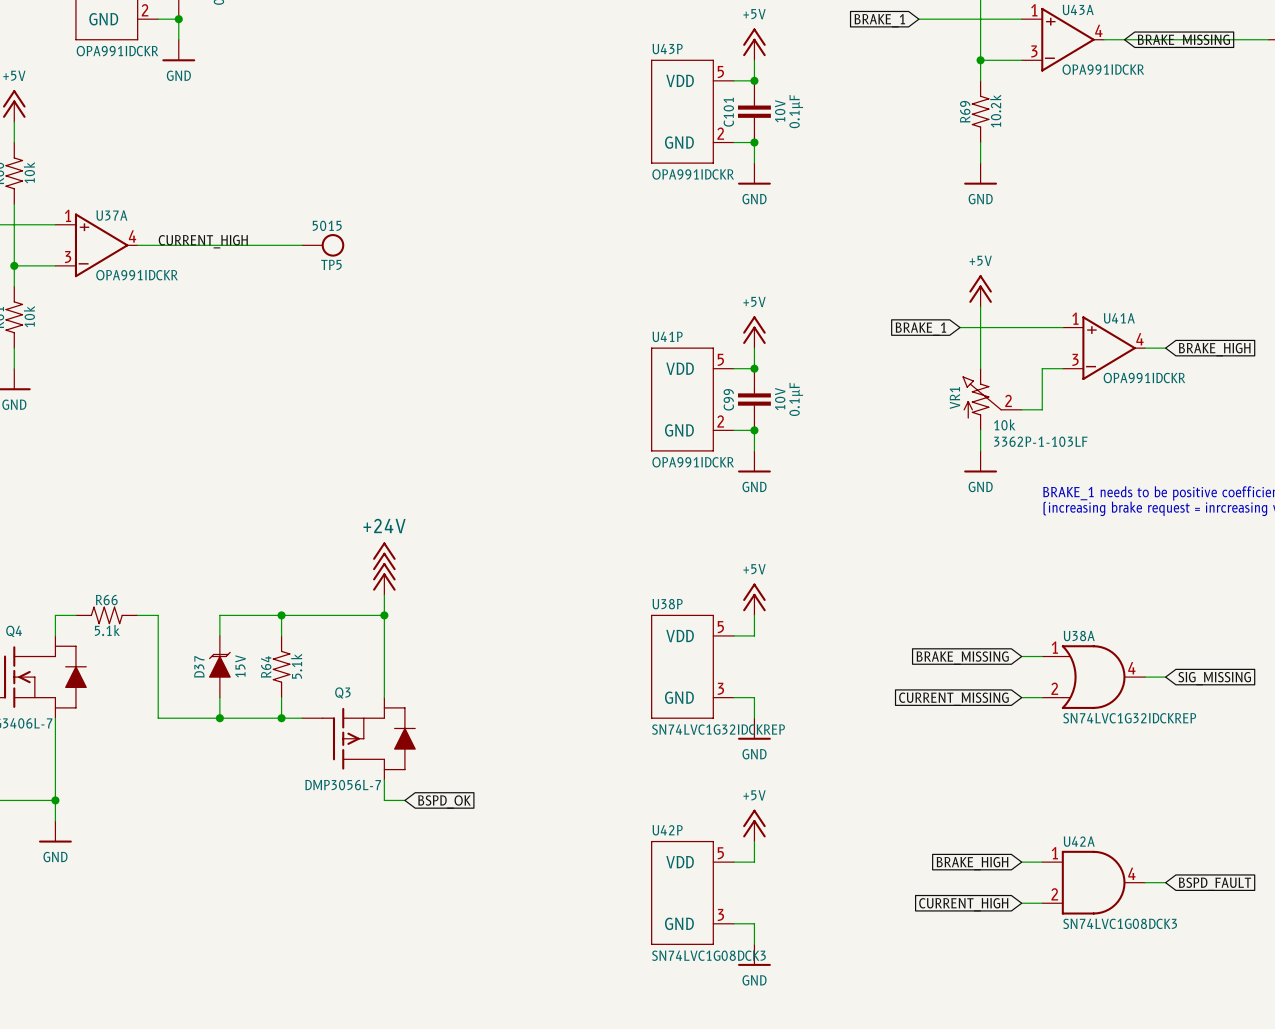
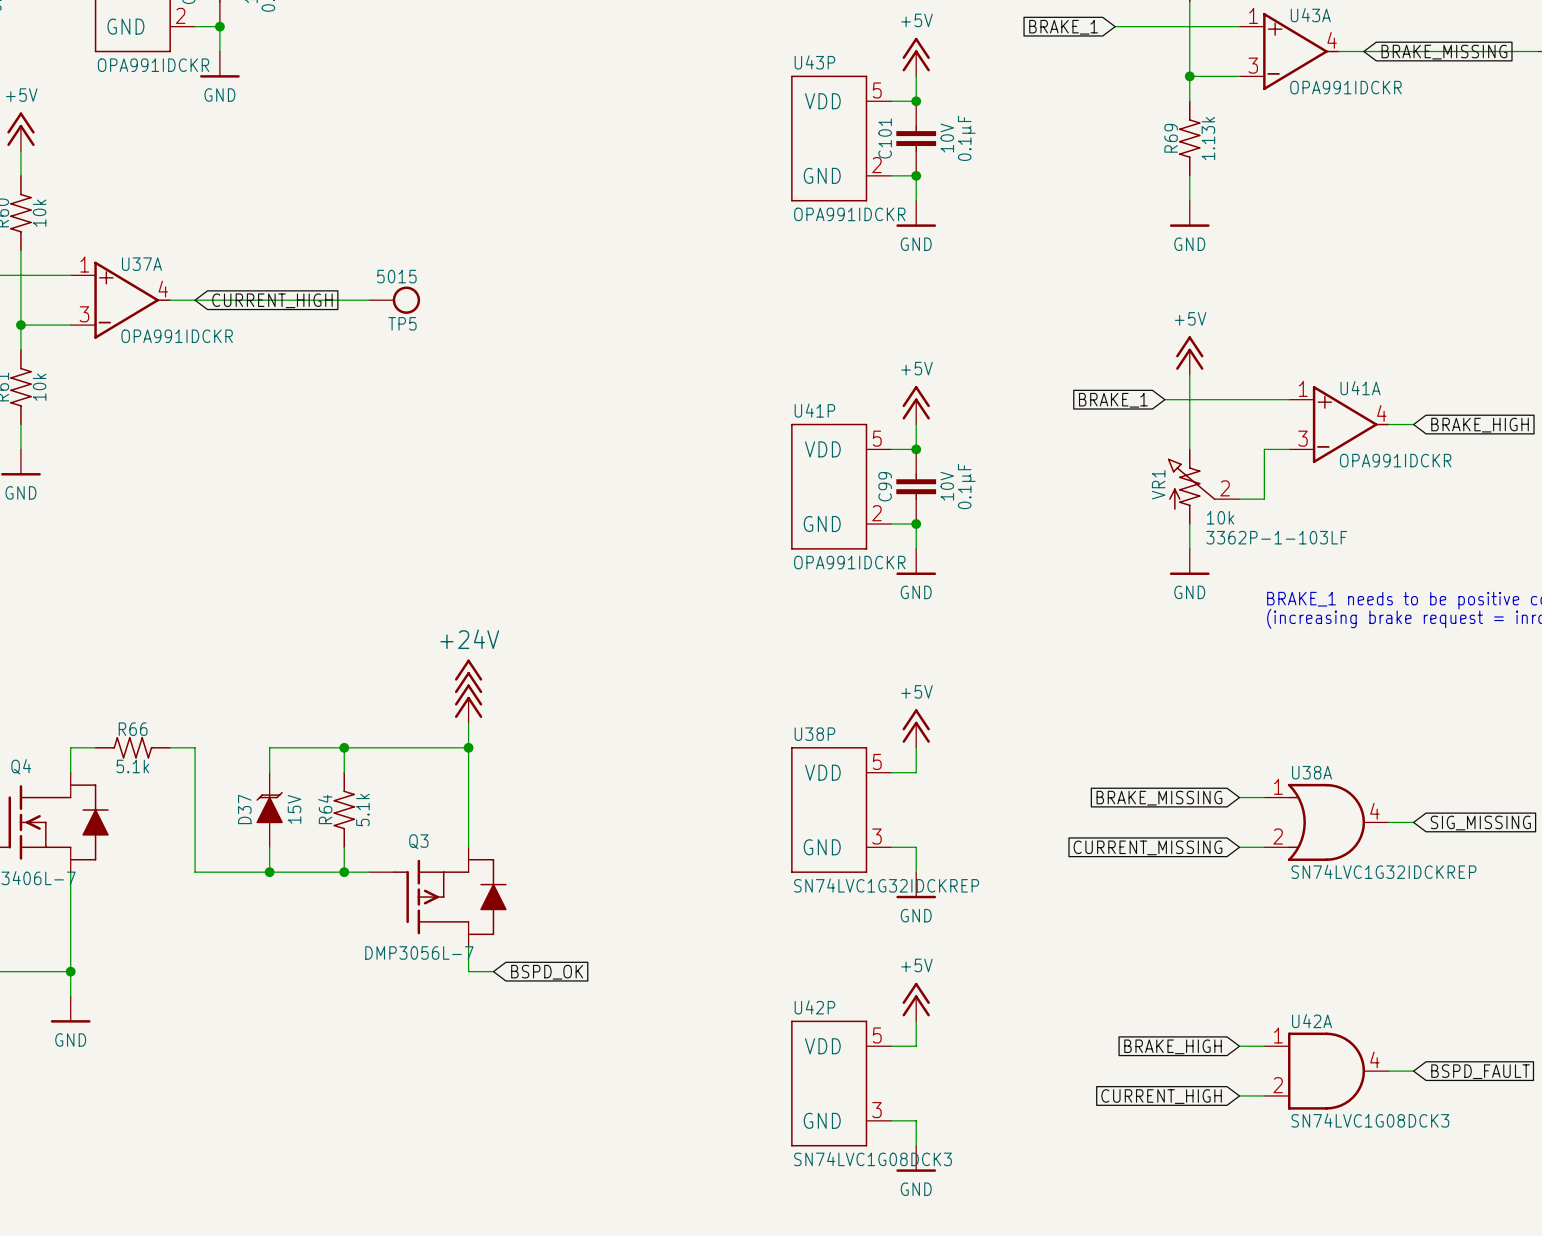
R69 text: 10.2k (995, 111) -> 1.13k (1208, 138)
label: CURRENT_HIGH (203, 241) -> none
global label: none -> CURRENT_HIGH (272, 300)

